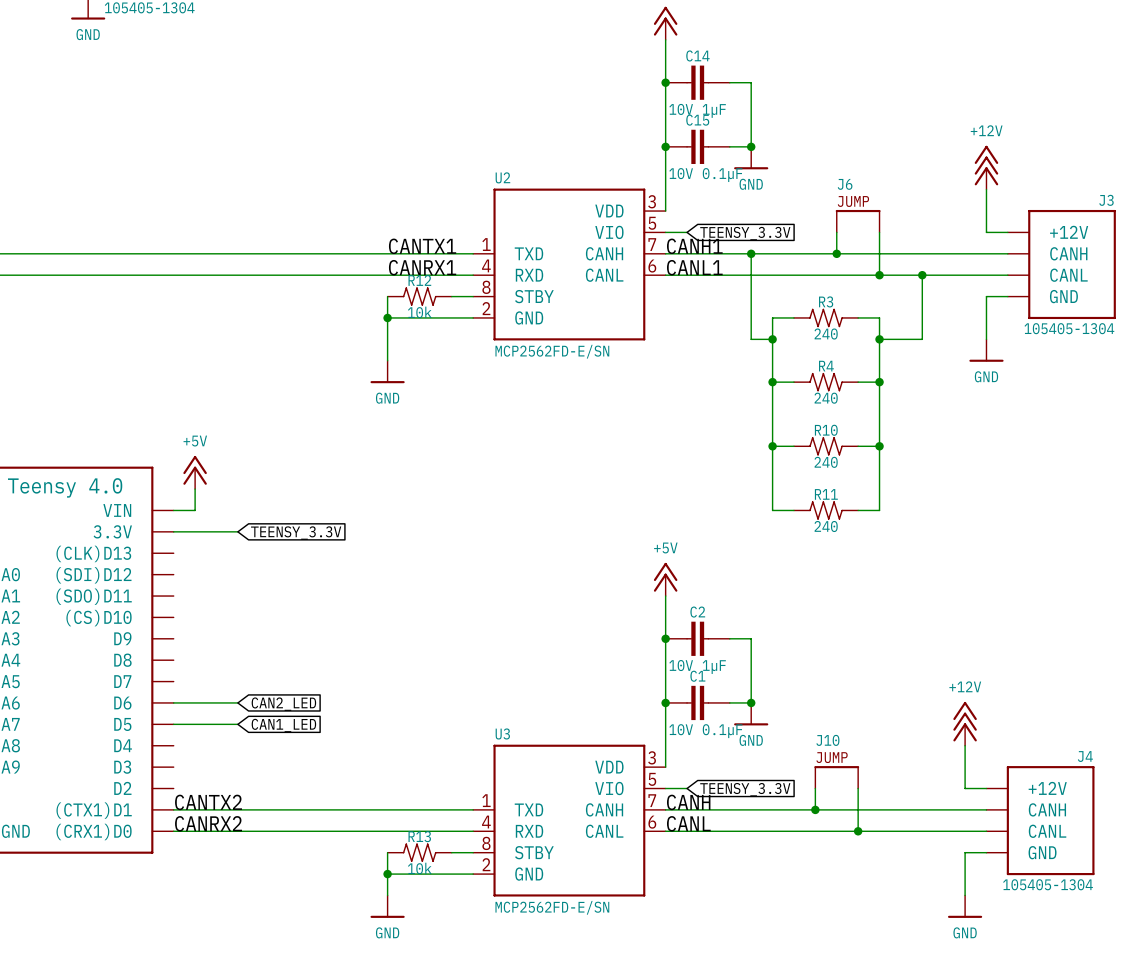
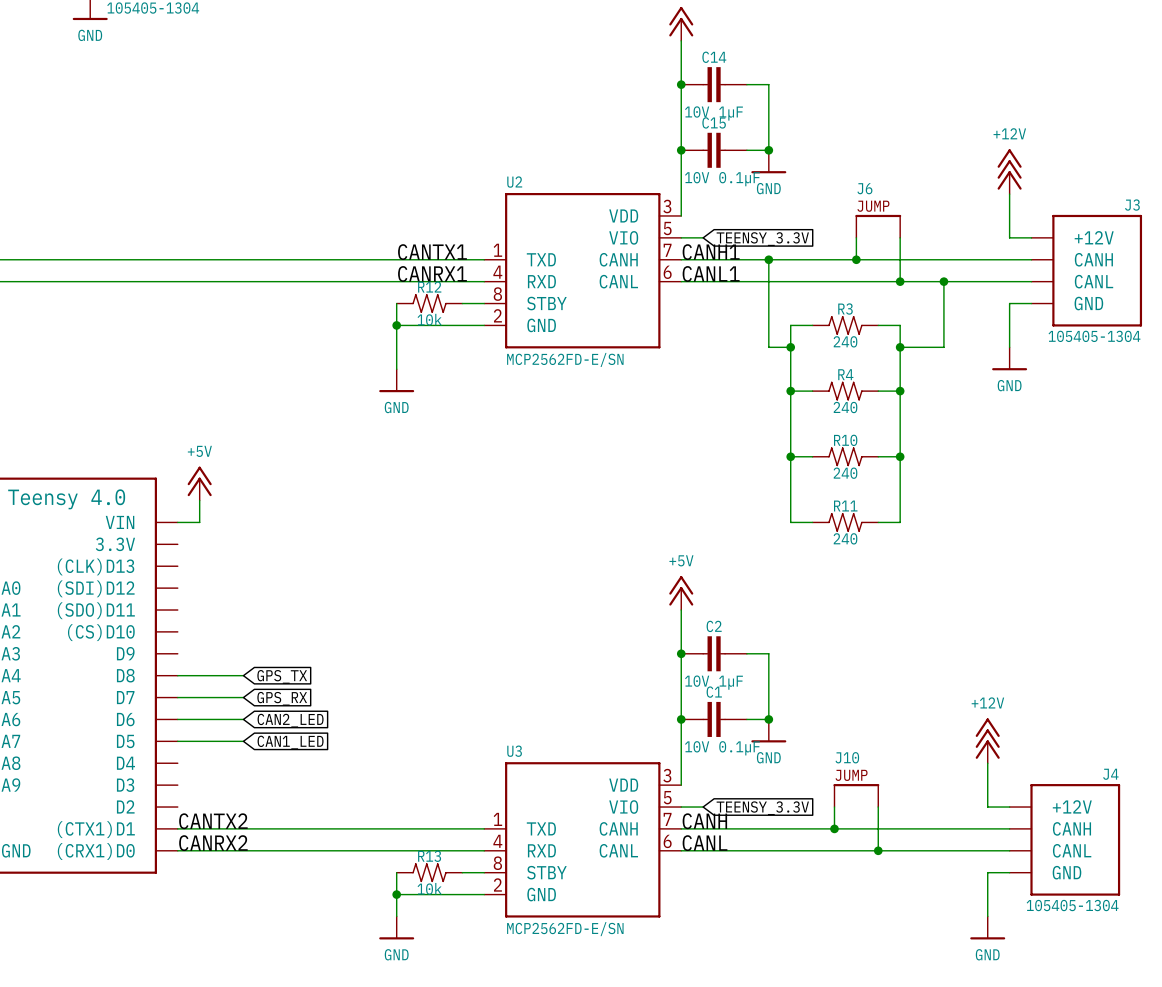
wire: (173, 531) (237, 531) -> (177, 675) (243, 675)
global label: TEENSY_3.3V (296, 533) -> none
global label: none -> GPS_TX (282, 676)
wire: none -> (177, 697) (243, 697)
global label: none -> GPS_RX (282, 698)

